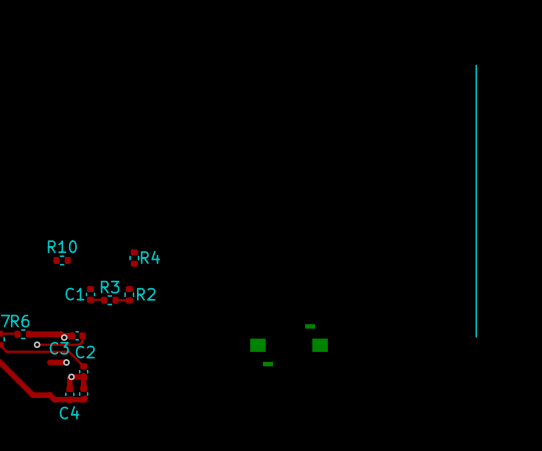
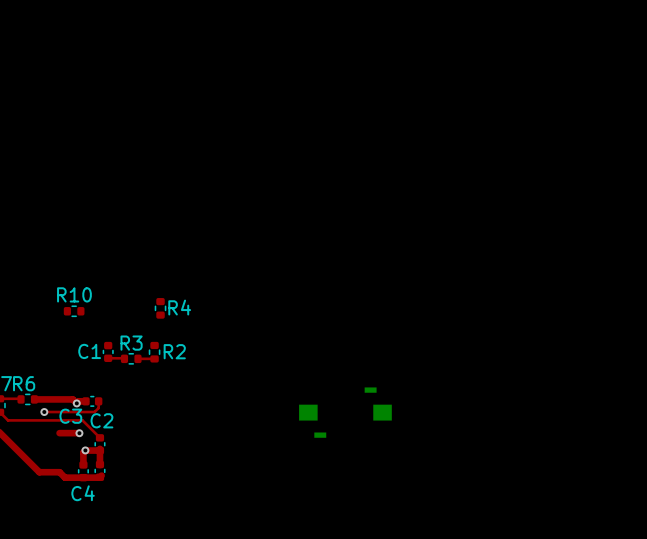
line: (476, 65) (476, 336) -> none

